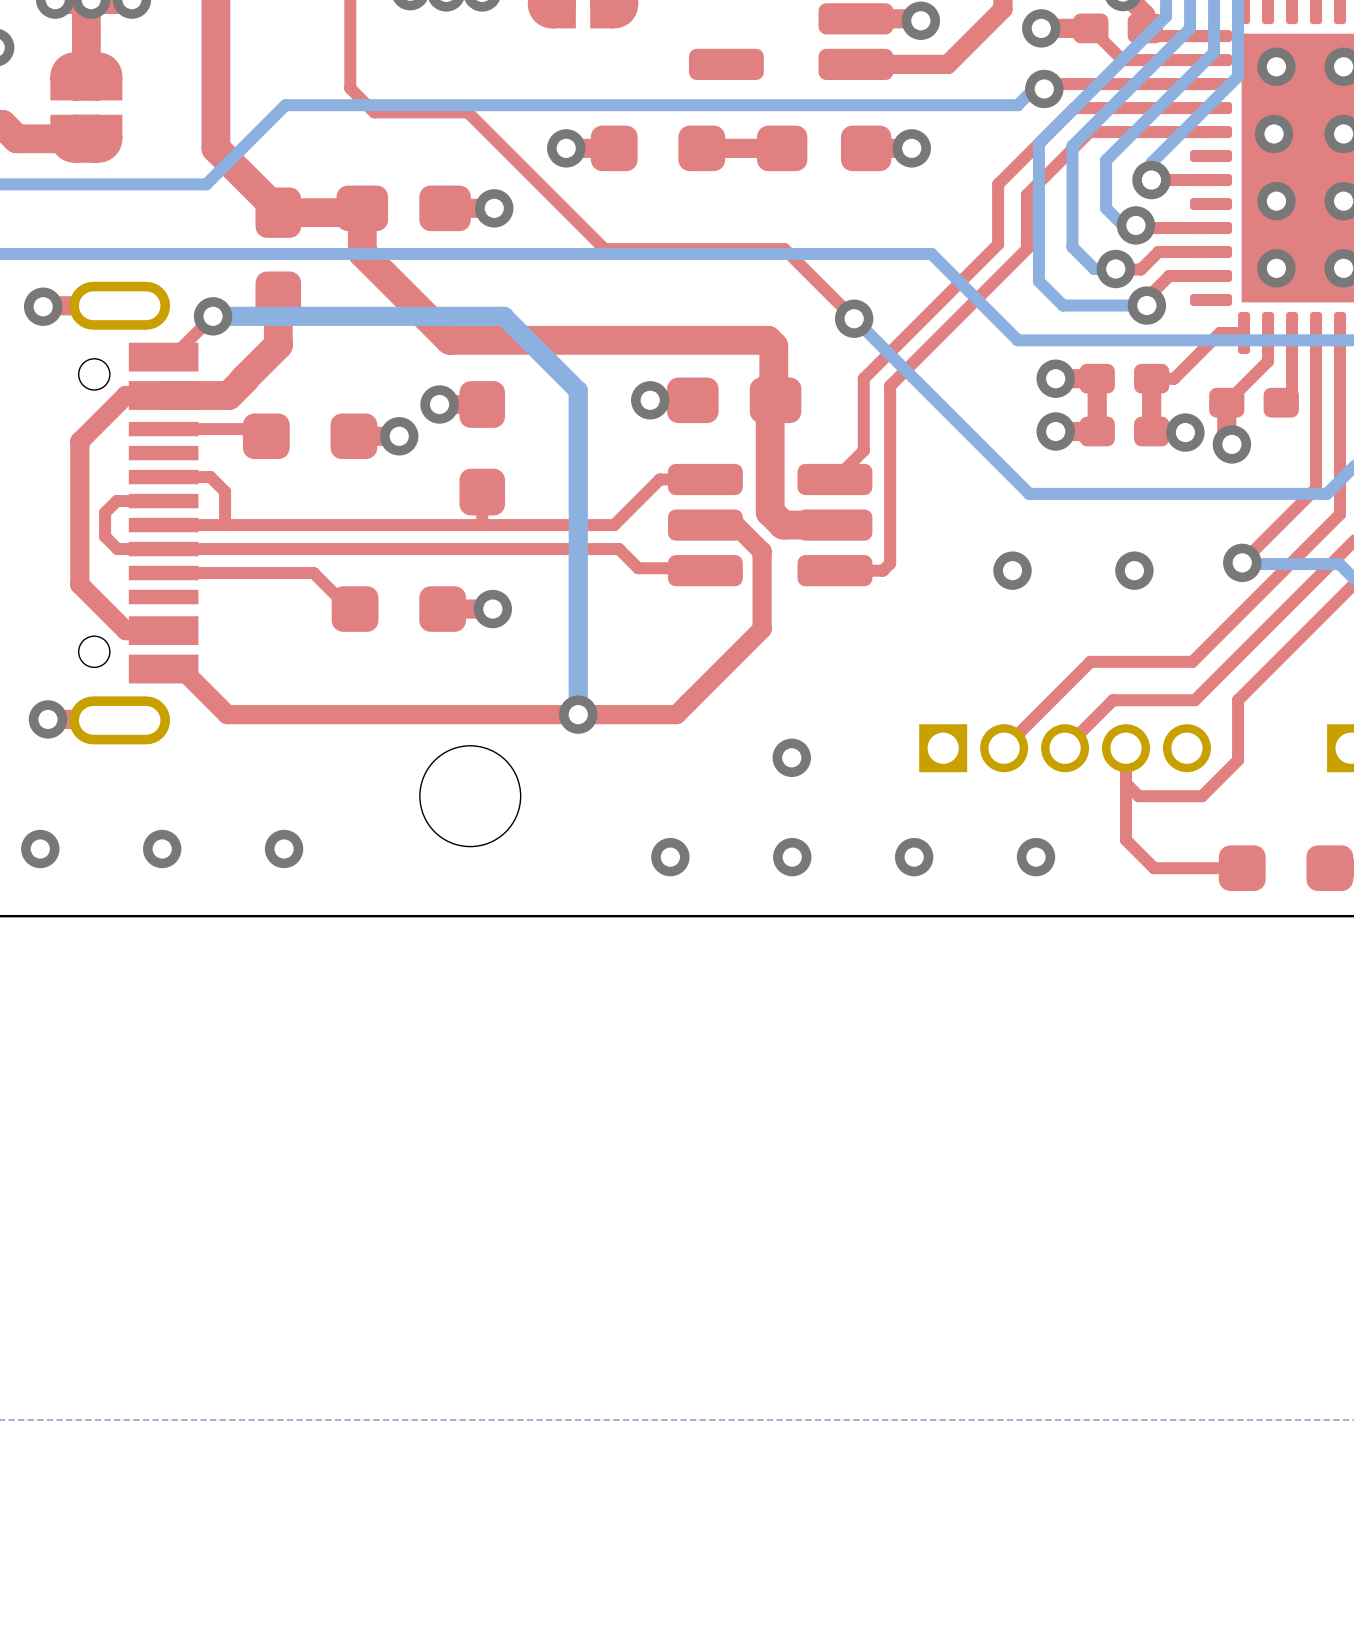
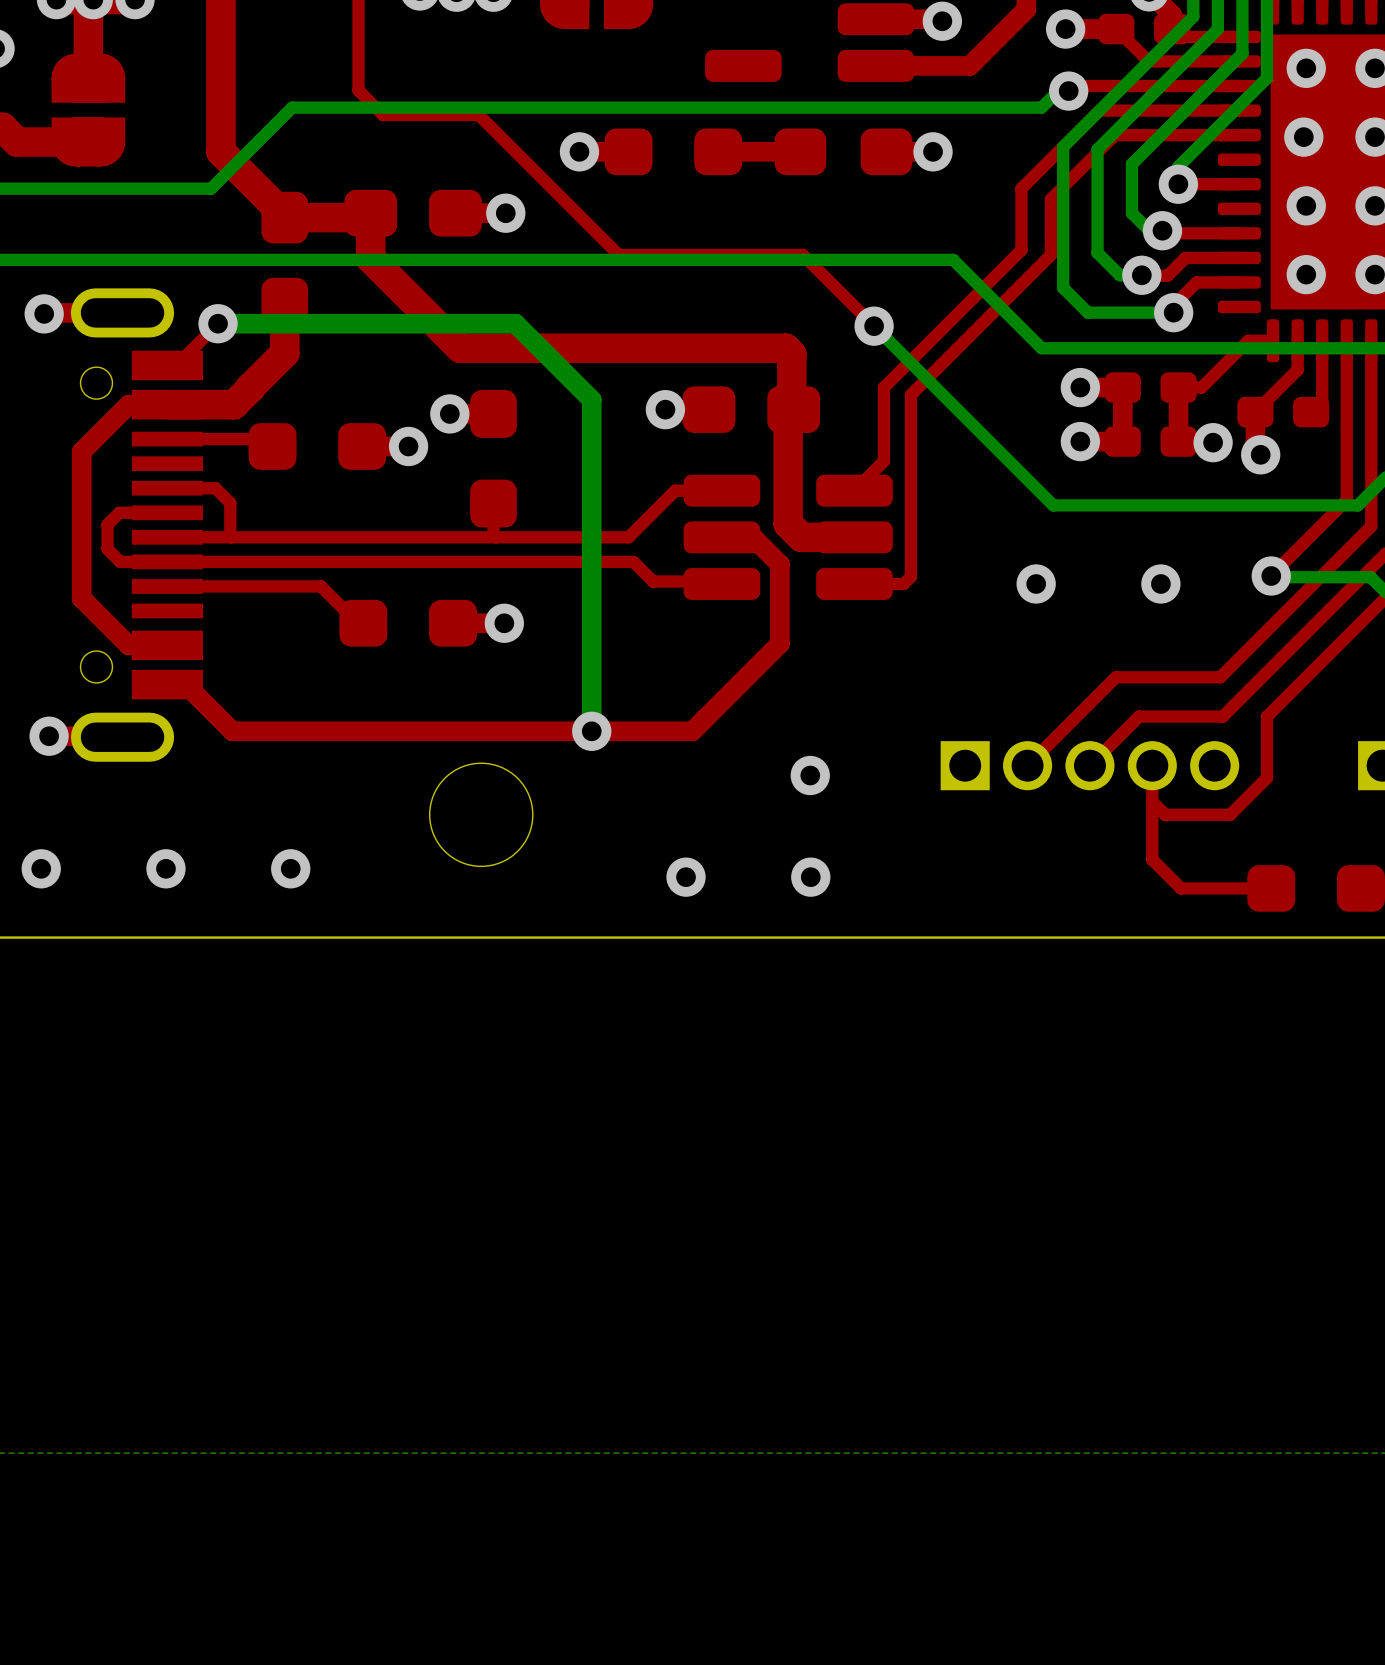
via: (914, 857) -> none
via: (1036, 857) -> none

